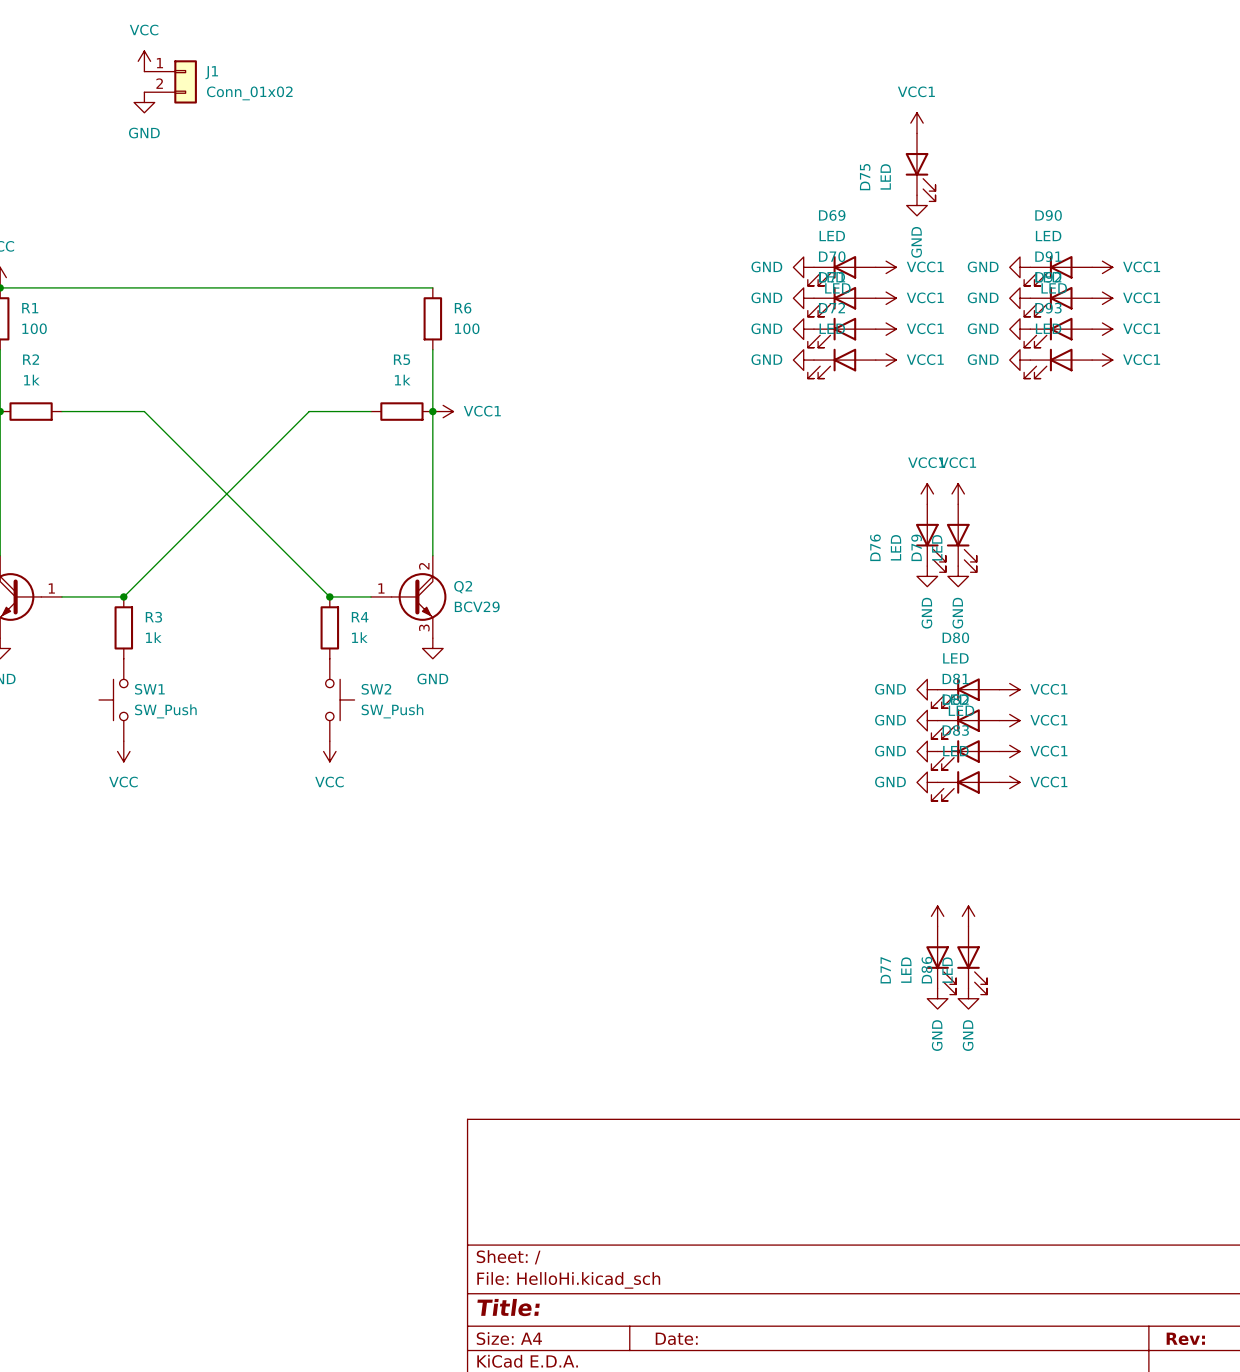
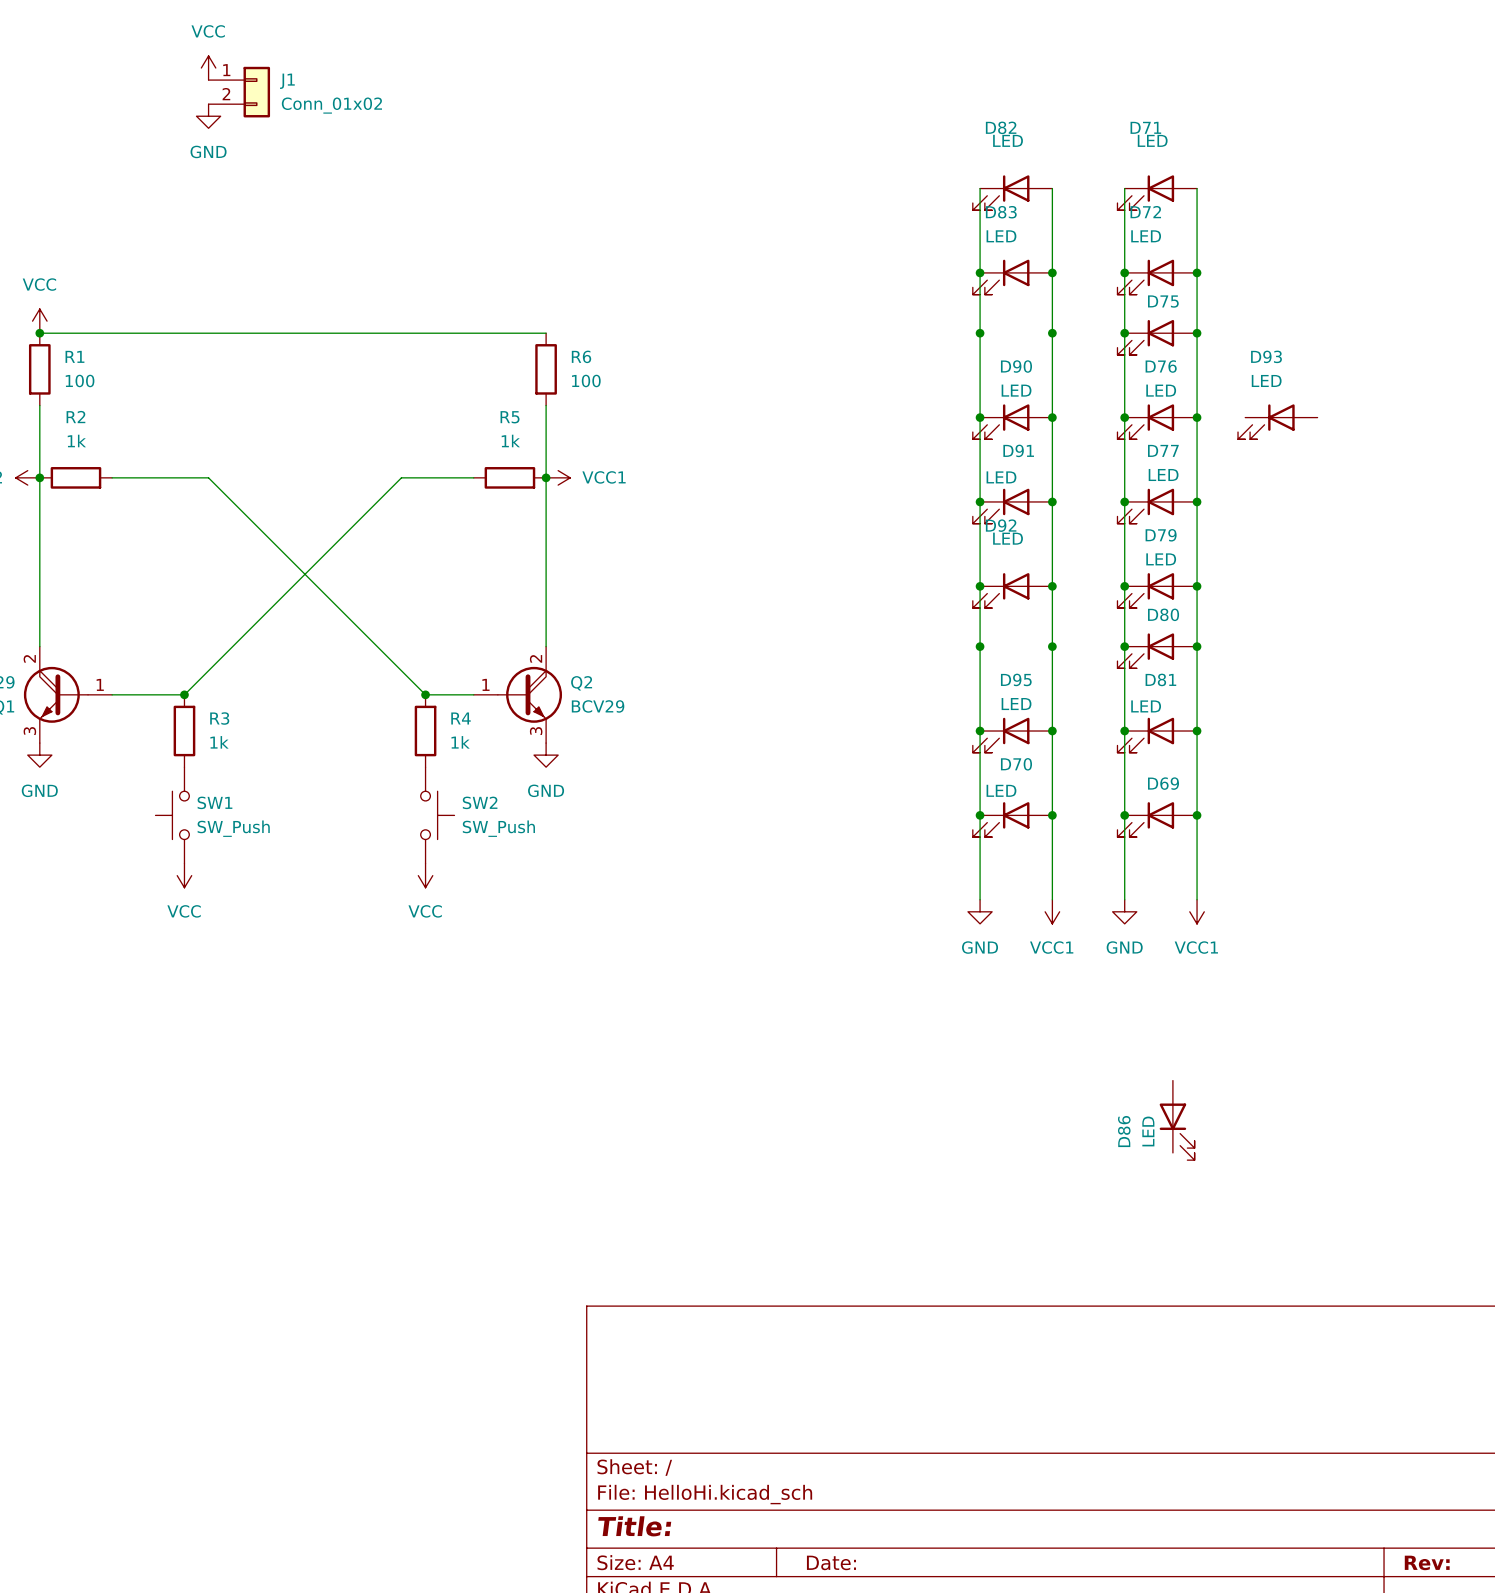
power symbol: VCC1 (916, 123) -> none
wire: none -> (980, 188) (980, 899)
wire: none -> (1052, 188) (1052, 899)
wire: none -> (1124, 188) (1124, 899)
wire: none -> (1197, 188) (1197, 899)
D75 position: (920, 167) -> (1157, 337)
D75 value: LED (885, 176) -> none
D75 name position: D75 (865, 177) -> D75 (1163, 301)
D75 rotation: 0° (920, 177) -> 90° clockwise (1145, 337)
power symbol: GND (916, 205) -> none
D69 name position: D69 (832, 215) -> D69 (1163, 783)
D90 name position: D90 (1048, 215) -> D90 (1016, 366)
junction: none -> (980, 272)
D69 value: LED (832, 236) -> none
junction: none -> (1052, 272)
junction: none -> (1124, 272)
junction: none -> (1197, 272)
D90 value position: LED (1048, 236) -> LED (1016, 390)
D70 name position: D70 (832, 256) -> D70 (1016, 764)
D91 name position: D91 (1048, 256) -> D91 (1018, 450)
power symbol: GND (803, 267) -> none
power symbol: VCC1 (886, 267) -> none
power symbol: GND (1020, 267) -> none
power symbol: VCC1 (1102, 267) -> none
D69 position: (841, 270) -> (1157, 819)
D90 position: (1058, 270) -> (1012, 421)
junction: none -> (980, 333)
junction: none -> (1052, 333)
junction: none -> (1124, 333)
junction: none -> (1197, 333)
power symbol: GND (803, 298) -> none
power symbol: VCC1 (886, 298) -> none
power symbol: GND (1020, 298) -> none
power symbol: VCC1 (1102, 298) -> none
D70 position: (841, 301) -> (1012, 819)
D91 position: (1058, 301) -> (1012, 506)
power symbol: GND (803, 329) -> none
power symbol: VCC1 (886, 329) -> none
power symbol: GND (1020, 329) -> none
power symbol: VCC1 (1102, 329) -> none
D71 position: (841, 332) -> (1157, 192)
D92 position: (1058, 332) -> (1012, 590)
power symbol: GND (803, 360) -> none
junction: none -> (980, 417)
junction: none -> (1052, 417)
power symbol: VCC1 (886, 360) -> none
junction: none -> (1124, 417)
junction: none -> (1197, 417)
power symbol: GND (1020, 360) -> none
power symbol: VCC1 (1102, 360) -> none
D72 position: (841, 363) -> (1157, 277)
junction: none -> (980, 501)
junction: none -> (1052, 501)
junction: none -> (1124, 501)
junction: none -> (1197, 501)
power symbol: VCC1 (927, 493) -> none
power symbol: VCC1 (958, 493) -> none
junction: none -> (980, 586)
junction: none -> (1052, 586)
junction: none -> (1124, 586)
junction: none -> (1197, 586)
D76 position: (930, 538) -> (1157, 421)
D76 rotation: 0° (930, 548) -> 90° clockwise (1145, 421)
D79 rotation: 0° (961, 548) -> 90° clockwise (1145, 590)
junction: none -> (980, 646)
junction: none -> (1052, 646)
junction: none -> (1124, 646)
junction: none -> (1197, 646)
power symbol: GND (927, 576) -> none
power symbol: GND (958, 576) -> none
junction: none -> (980, 731)
junction: none -> (1052, 731)
junction: none -> (1124, 731)
junction: none -> (1197, 731)
D95: none -> LED (1012, 735)
D80 name position: D80 (955, 637) -> D80 (1163, 614)
D80 value: LED (955, 658) -> none
D81 name position: D81 (955, 679) -> D81 (1160, 679)
power symbol: GND (927, 689) -> none
power symbol: VCC1 (1009, 689) -> none
D80 position: (965, 693) -> (1157, 650)
junction: none -> (980, 815)
junction: none -> (1052, 815)
junction: none -> (1124, 815)
junction: none -> (1197, 815)
power symbol: GND (927, 720) -> none
power symbol: VCC1 (1009, 720) -> none
D81 position: (965, 724) -> (1157, 735)
power symbol: GND (927, 751) -> none
power symbol: VCC1 (1009, 751) -> none
D82 position: (965, 755) -> (1012, 192)
power symbol: none -> GND (980, 911)
power symbol: none -> VCC1 (1052, 911)
power symbol rotation: 0° (927, 782) -> 90° counterclockwise (1124, 911)
power symbol: none -> VCC1 (1197, 911)
power symbol: VCC1 (1009, 782) -> none
D83 position: (965, 786) -> (1012, 277)
power symbol: (937, 916) -> none
power symbol: (968, 916) -> none
D77 position: (941, 960) -> (1157, 506)
D77 name position: D77 (885, 970) -> D77 (1163, 450)
D77 value position: LED (906, 970) -> LED (1163, 475)
D77 rotation: 0° (941, 970) -> 90° clockwise (1145, 506)
power symbol: GND (937, 998) -> none
power symbol: GND (968, 998) -> none

